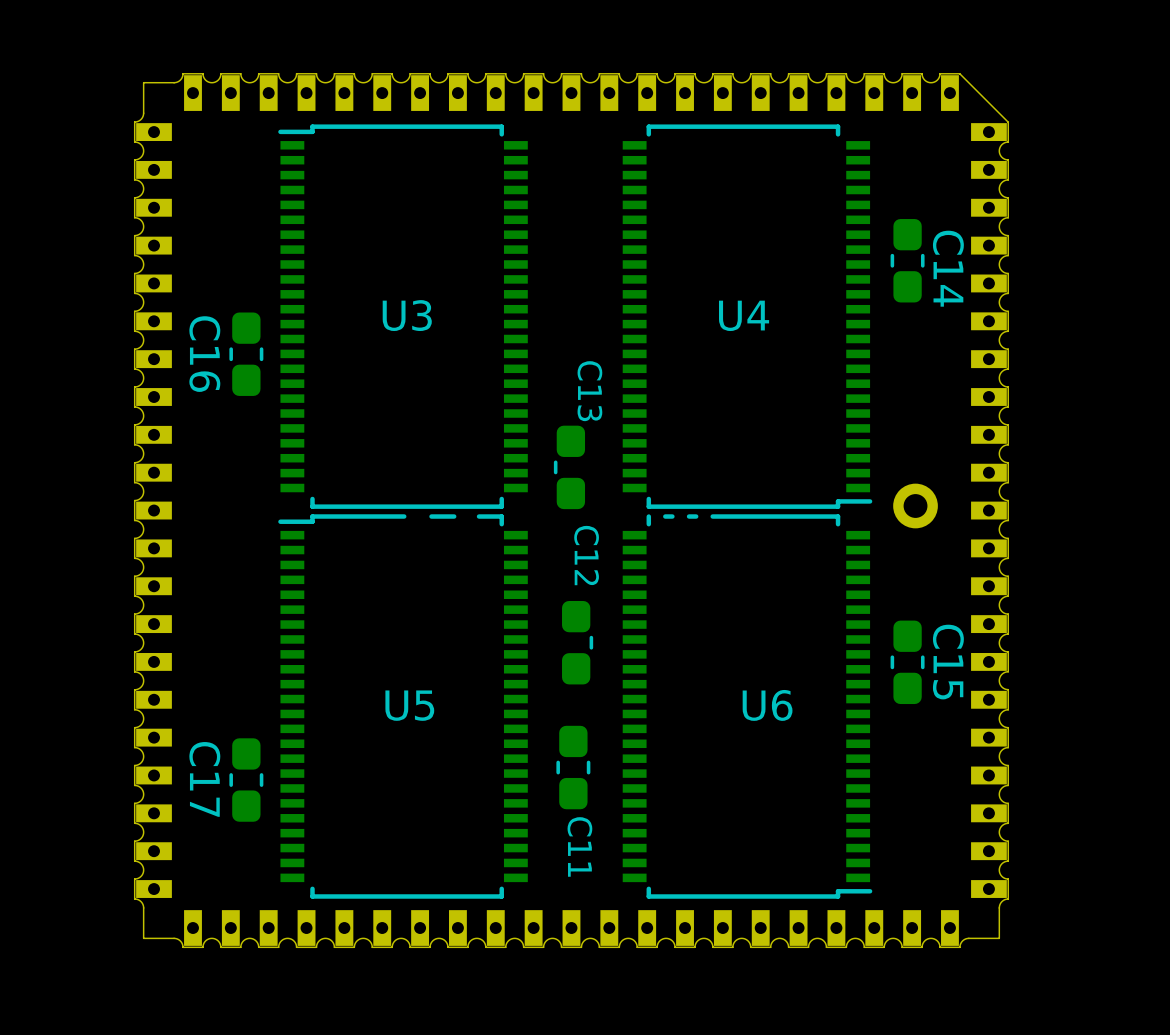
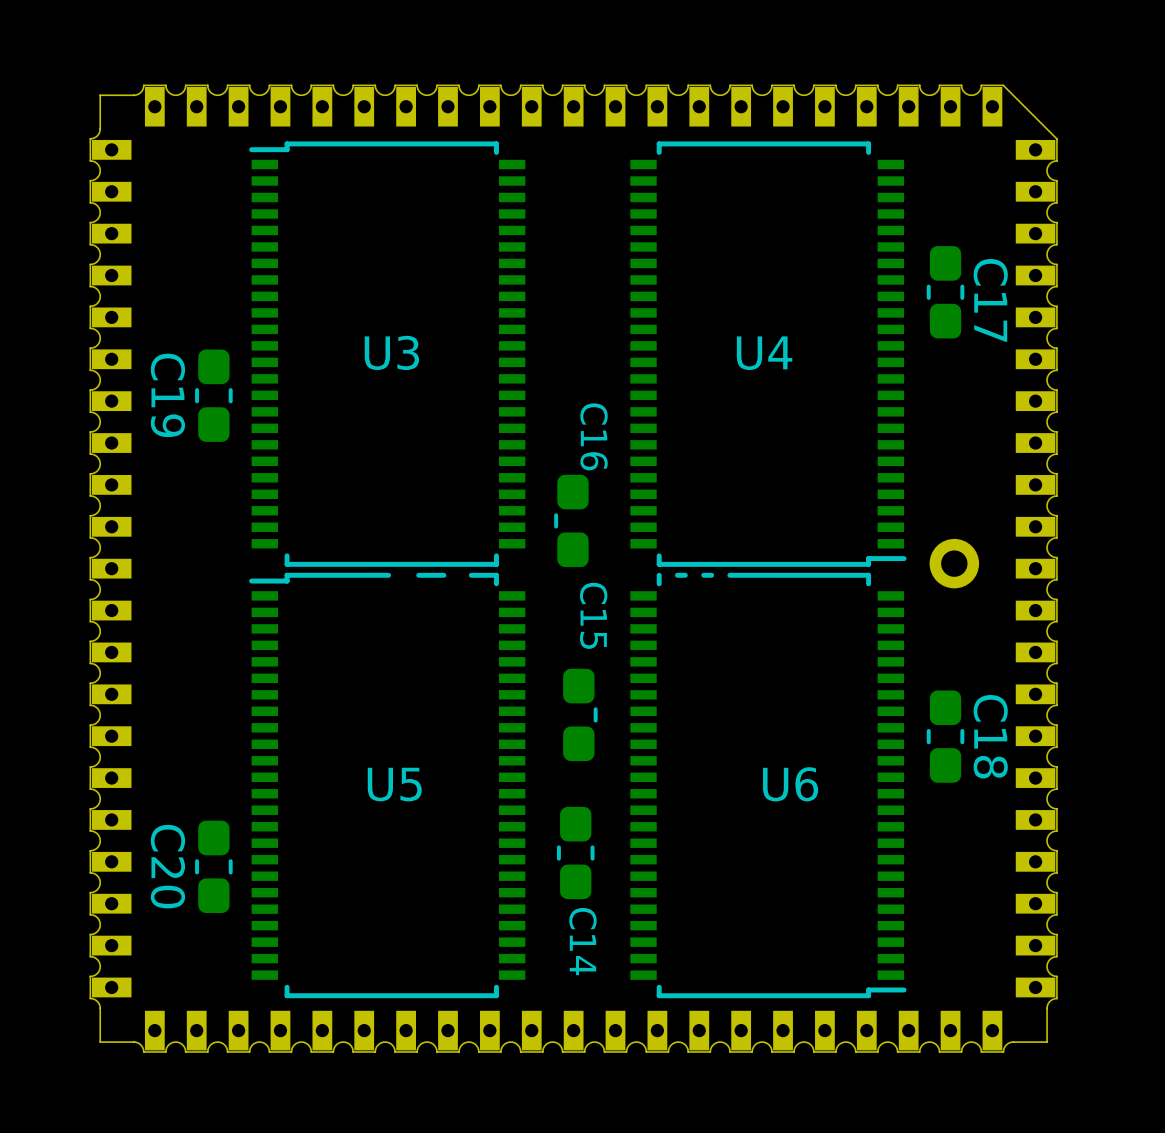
C14 name: C14 (948, 268) -> C17 (990, 300)
C16 name: C16 (204, 354) -> C19 (167, 395)
C13 name: C13 (589, 391) -> C16 (594, 436)
C12 name: C12 (586, 555) -> C15 (593, 615)
C15 name: C15 (948, 662) -> C18 (990, 736)
C17 name: C17 (204, 779) -> C20 (167, 866)
C11 name: C11 (579, 846) -> C14 (582, 941)

